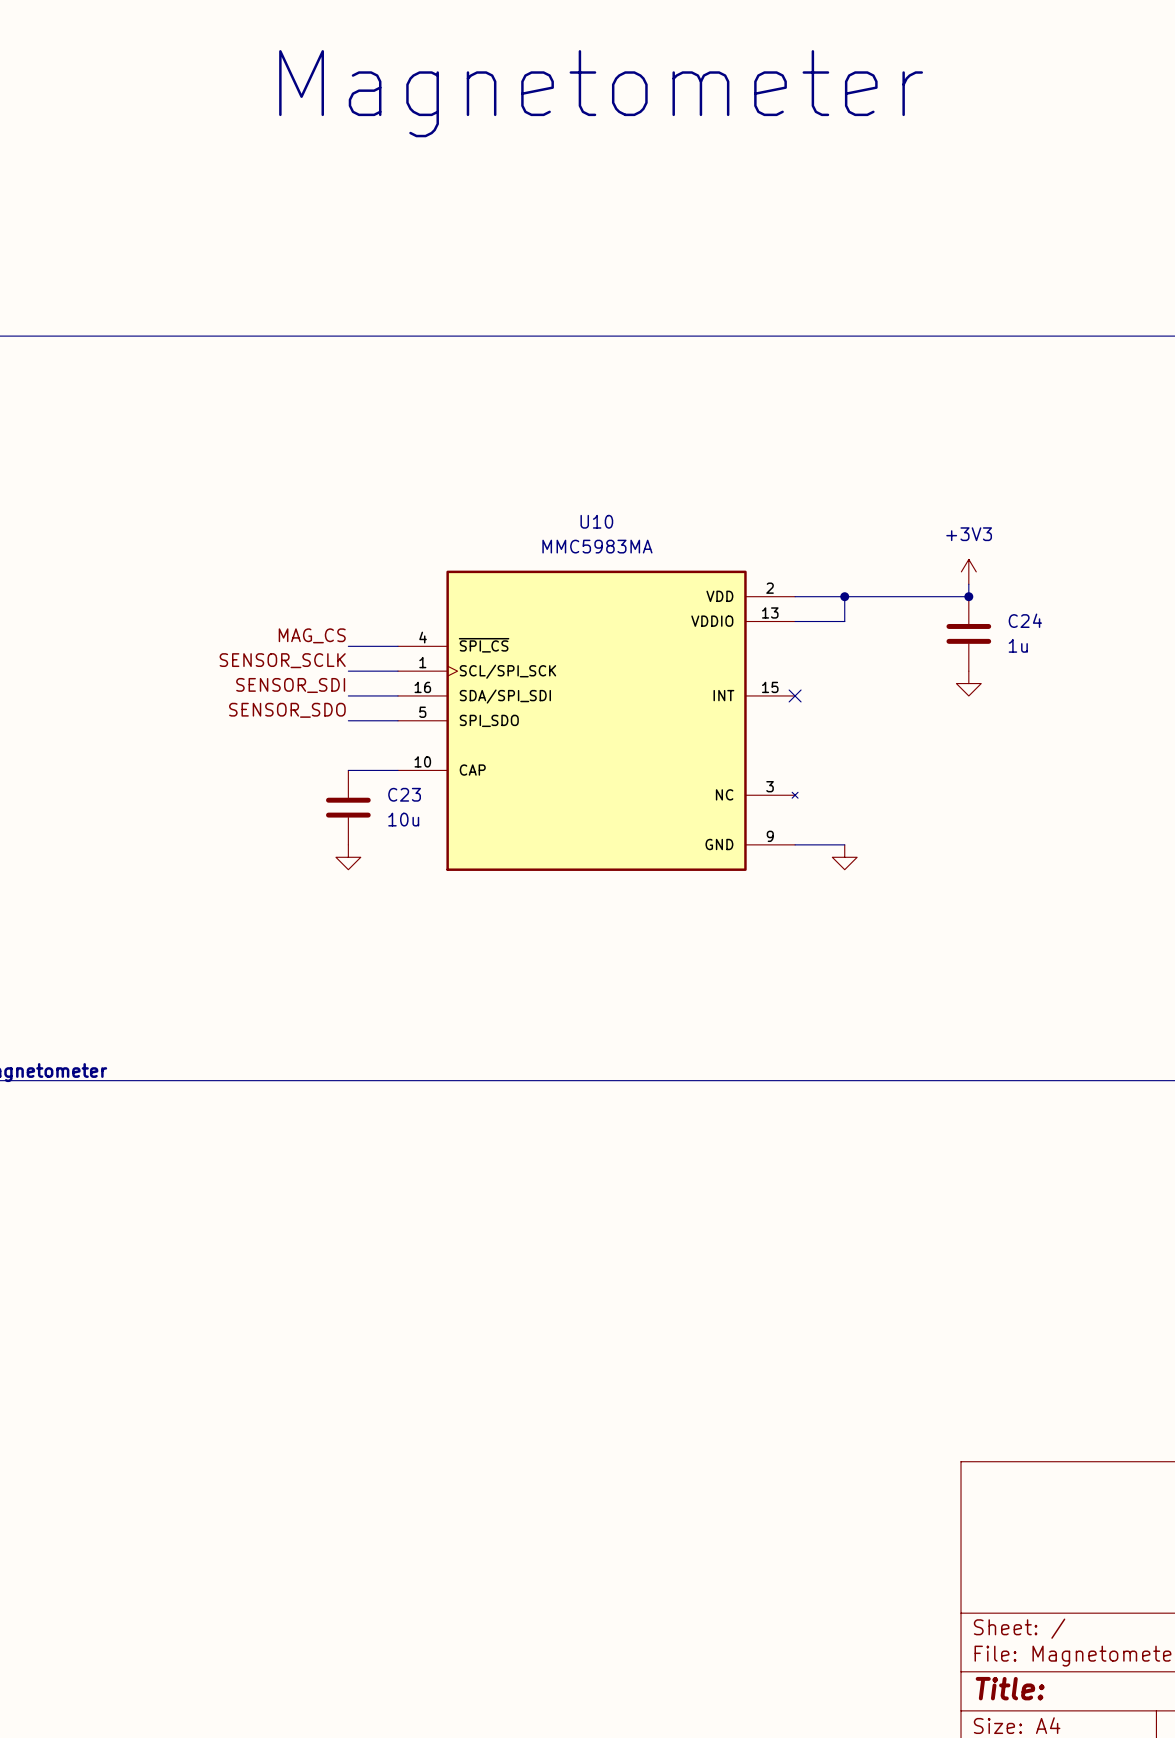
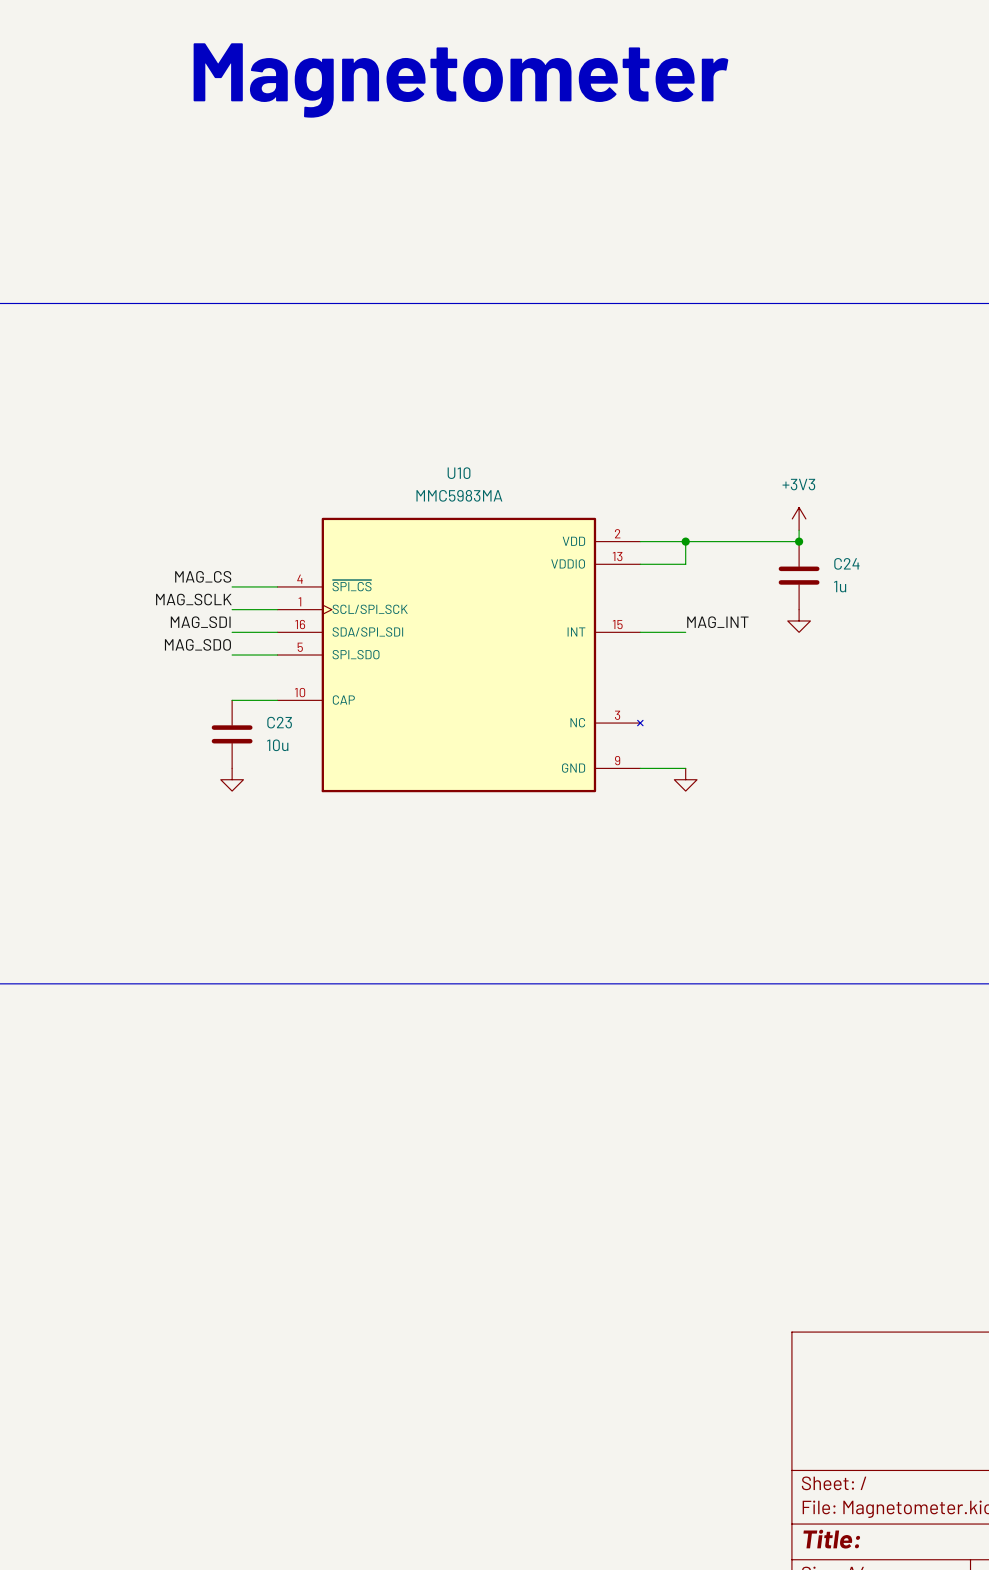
label: SENSOR_SCLK (282, 660) -> MAG_SCLK (193, 599)
label: SENSOR_SDI (290, 685) -> MAG_SDI (200, 622)
label: none -> MAG_INT (717, 622)
wire: none -> (640, 632) (685, 632)
no-connect mark: (795, 695) -> none
label: SENSOR_SDO (287, 710) -> MAG_SDO (197, 644)

